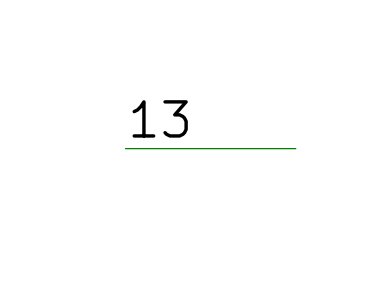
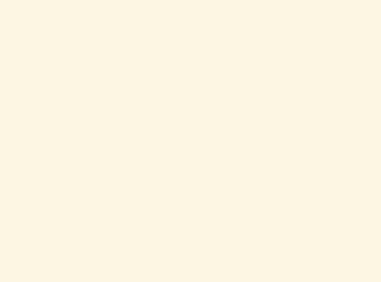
label: 13 (160, 118) -> none
wire: (125, 148) (295, 148) -> none

